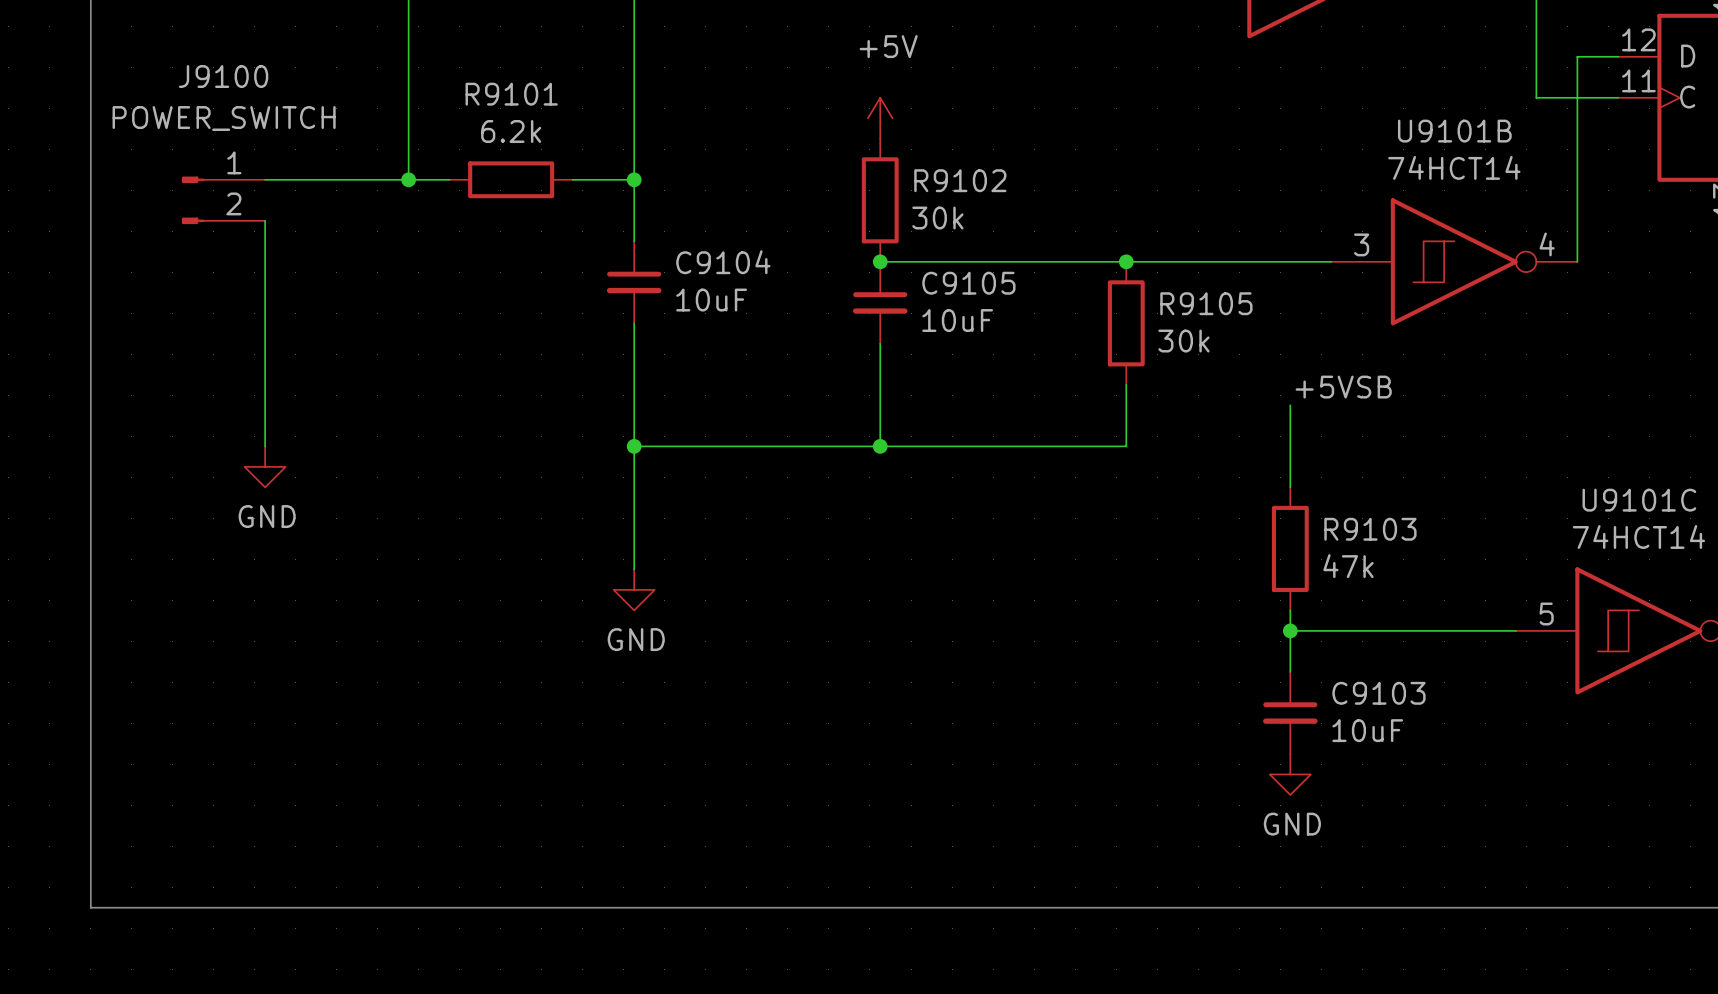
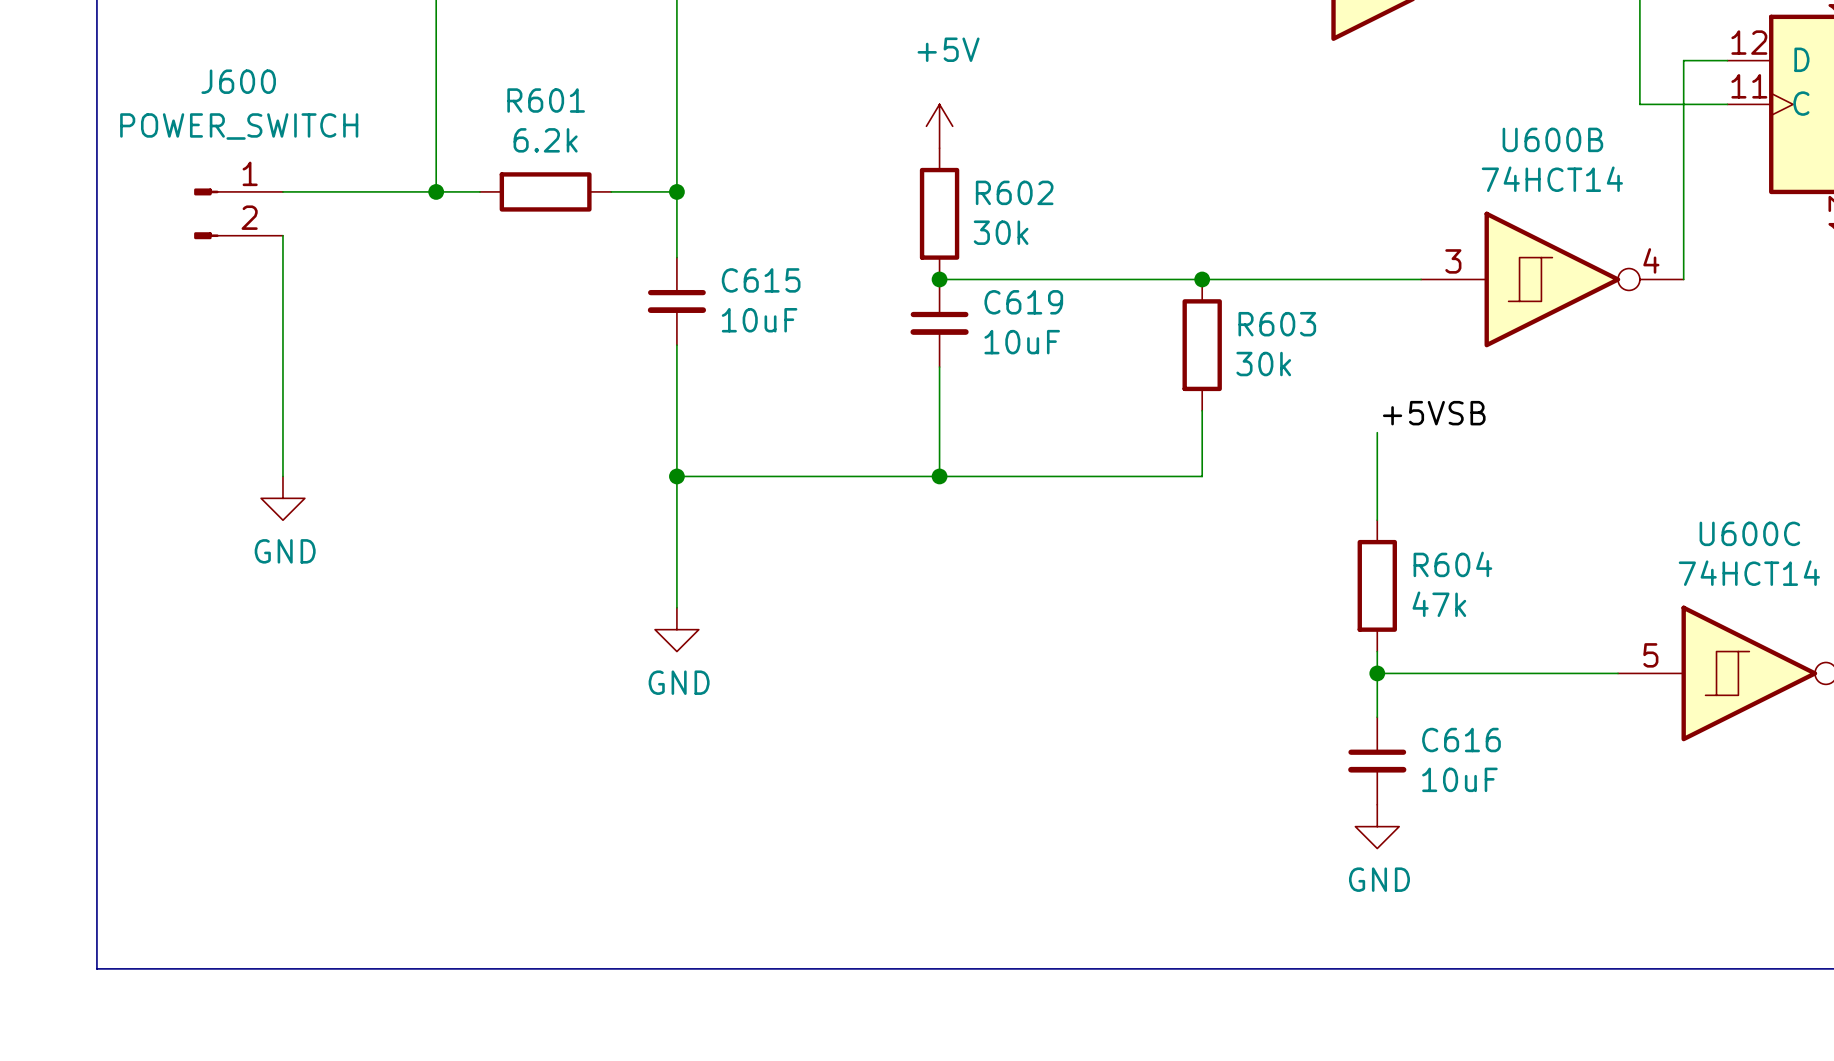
J9100 name: J9100 (223, 76) -> J600 (238, 81)
R9101 name: R9101 (511, 94) -> R601 (546, 100)
U9101B name: U9101B (1454, 131) -> U600B (1552, 139)
R9102 name: R9102 (960, 180) -> R602 (1014, 192)
C9104 name: C9104 (723, 262) -> C615 (761, 280)
C9105 name: C9105 (968, 283) -> C619 (1023, 302)
R9105 name: R9105 (1206, 303) -> R603 (1277, 324)
U9101C name: U9101C (1639, 500) -> U600C (1749, 533)
R9103 name: R9103 (1370, 529) -> R604 (1452, 564)
C9103 name: C9103 (1378, 693) -> C616 (1461, 740)

